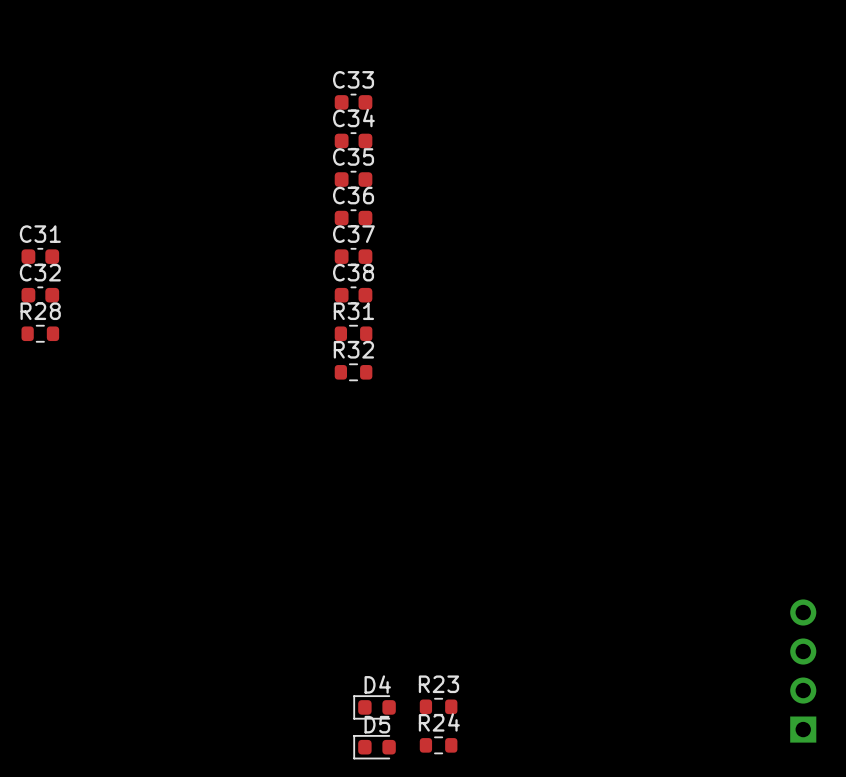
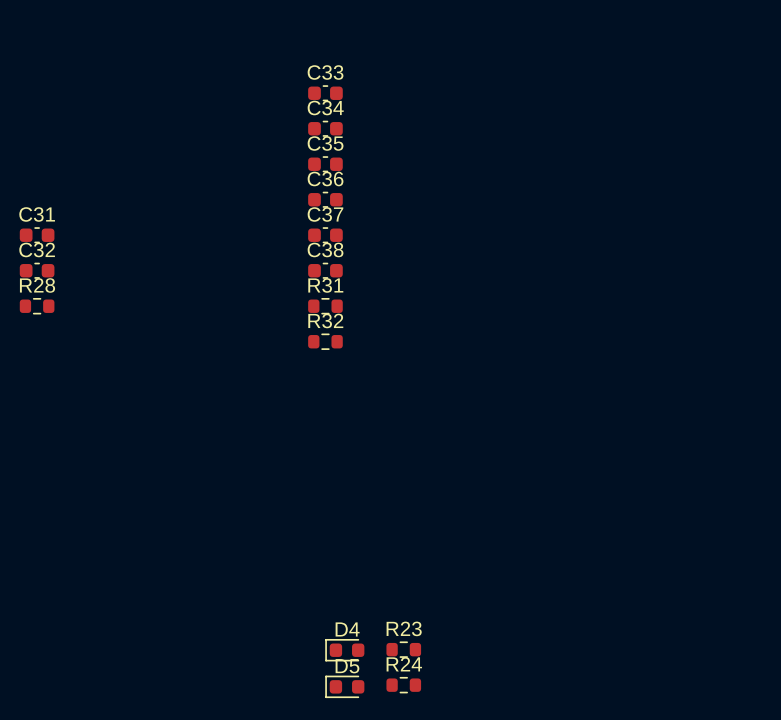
part: (803, 671) -> none

